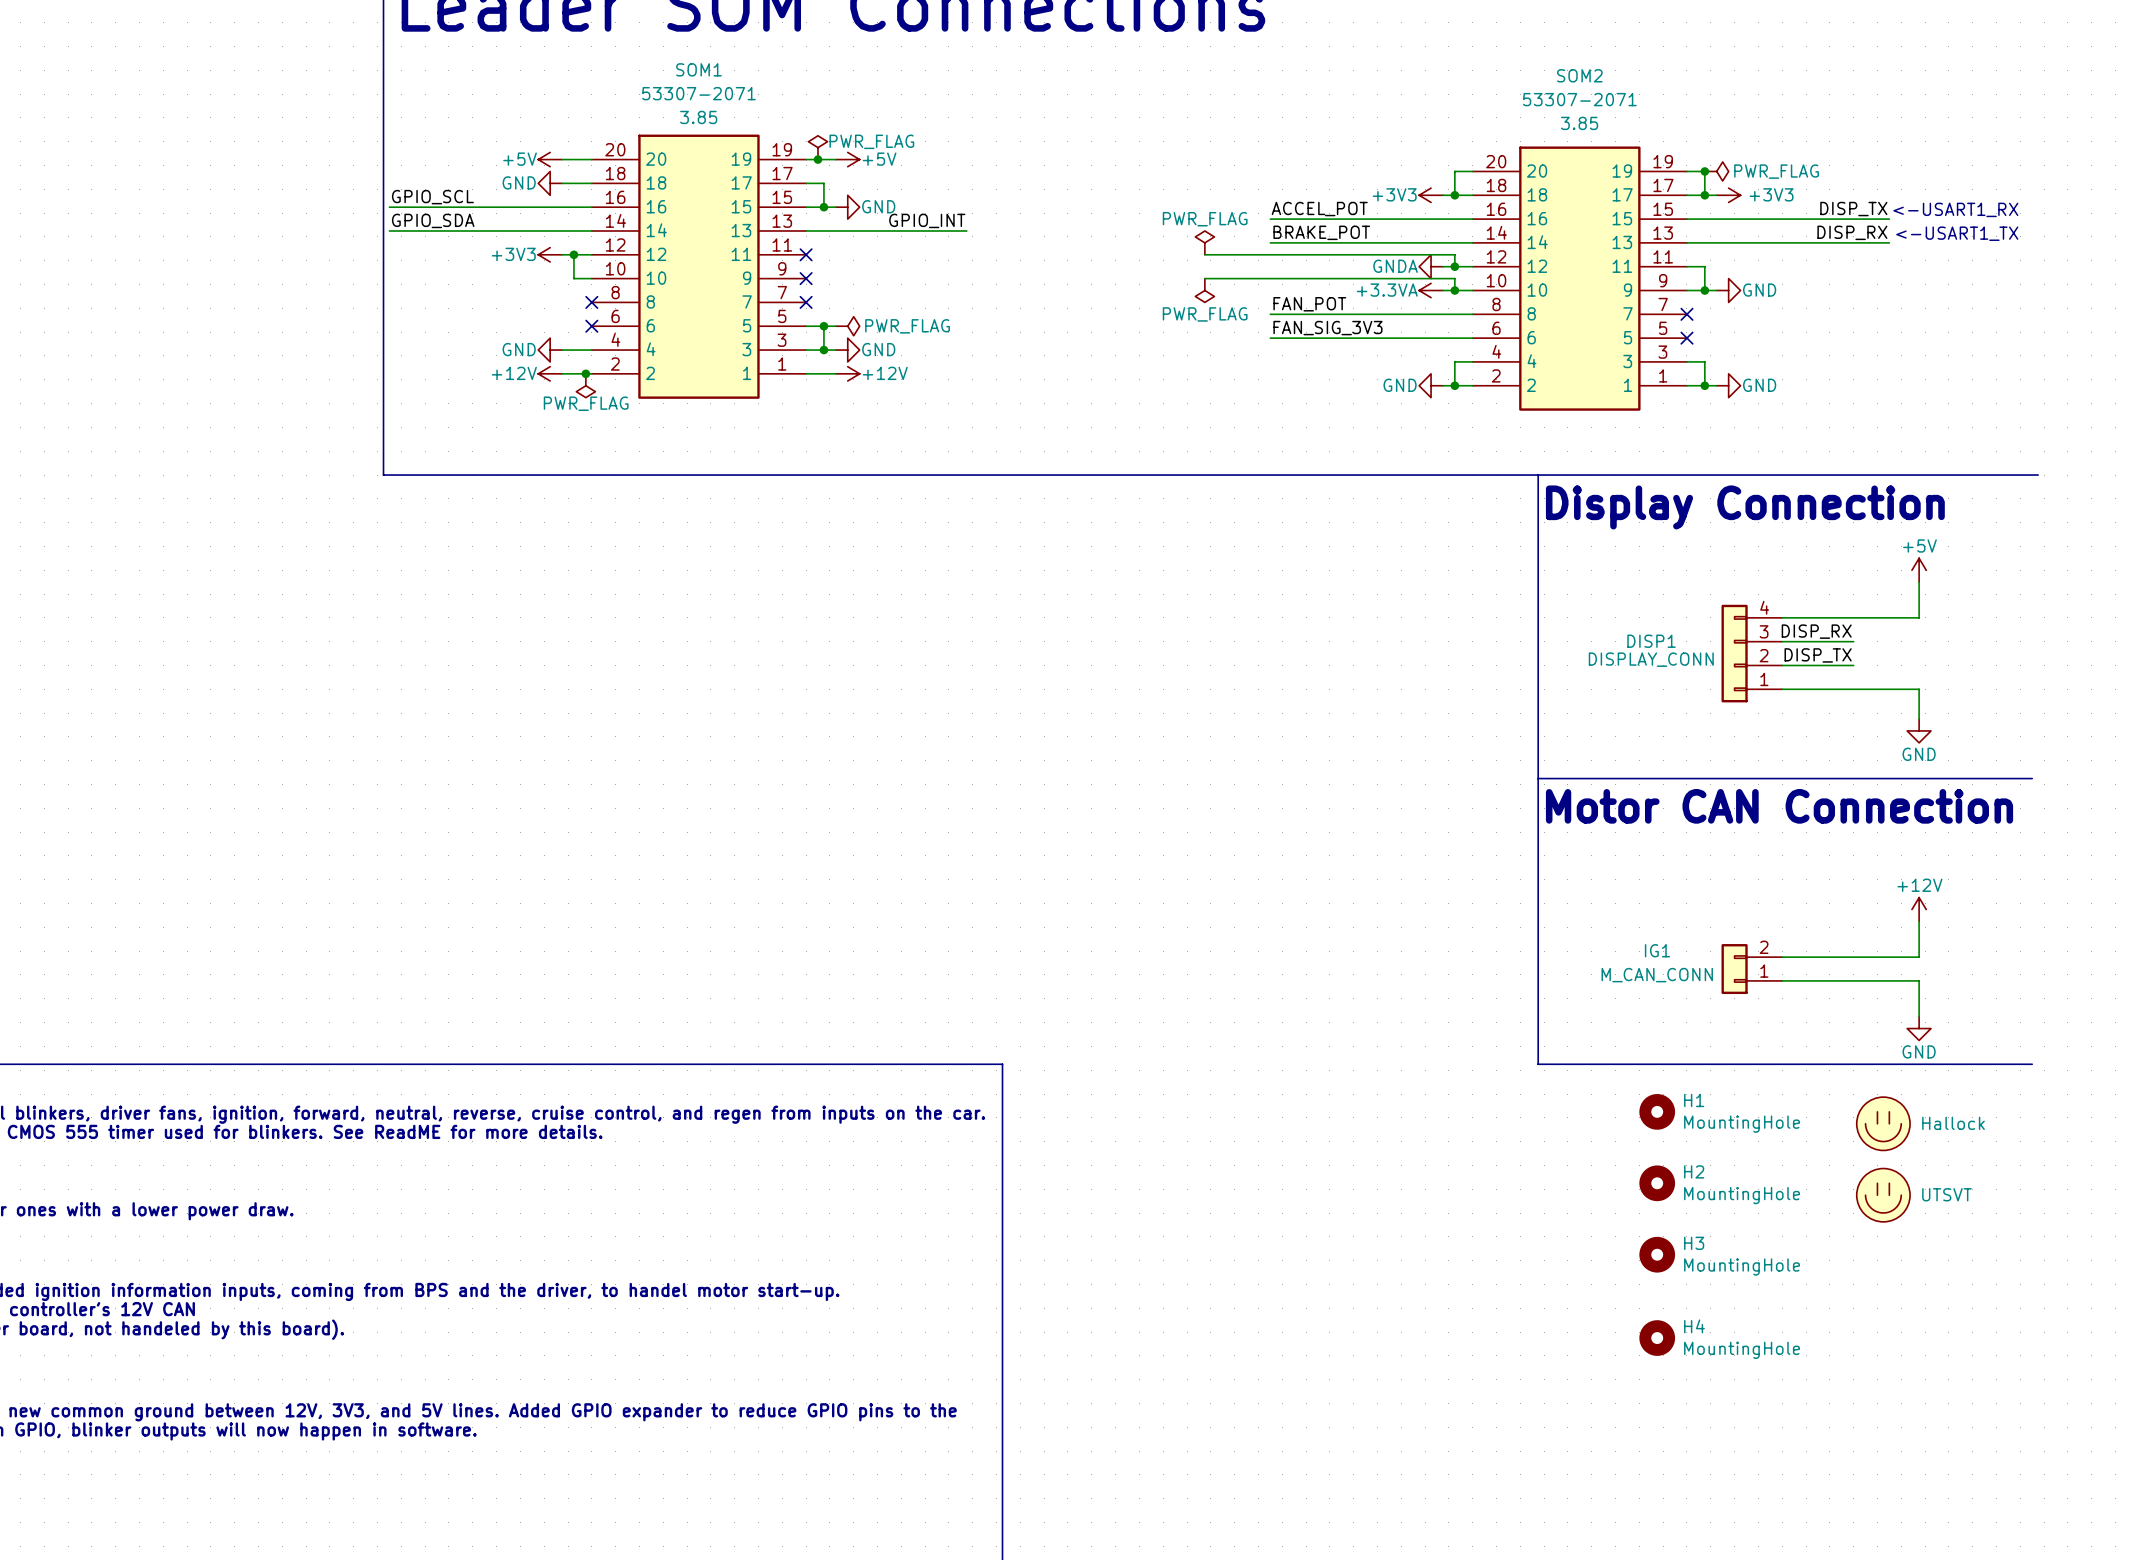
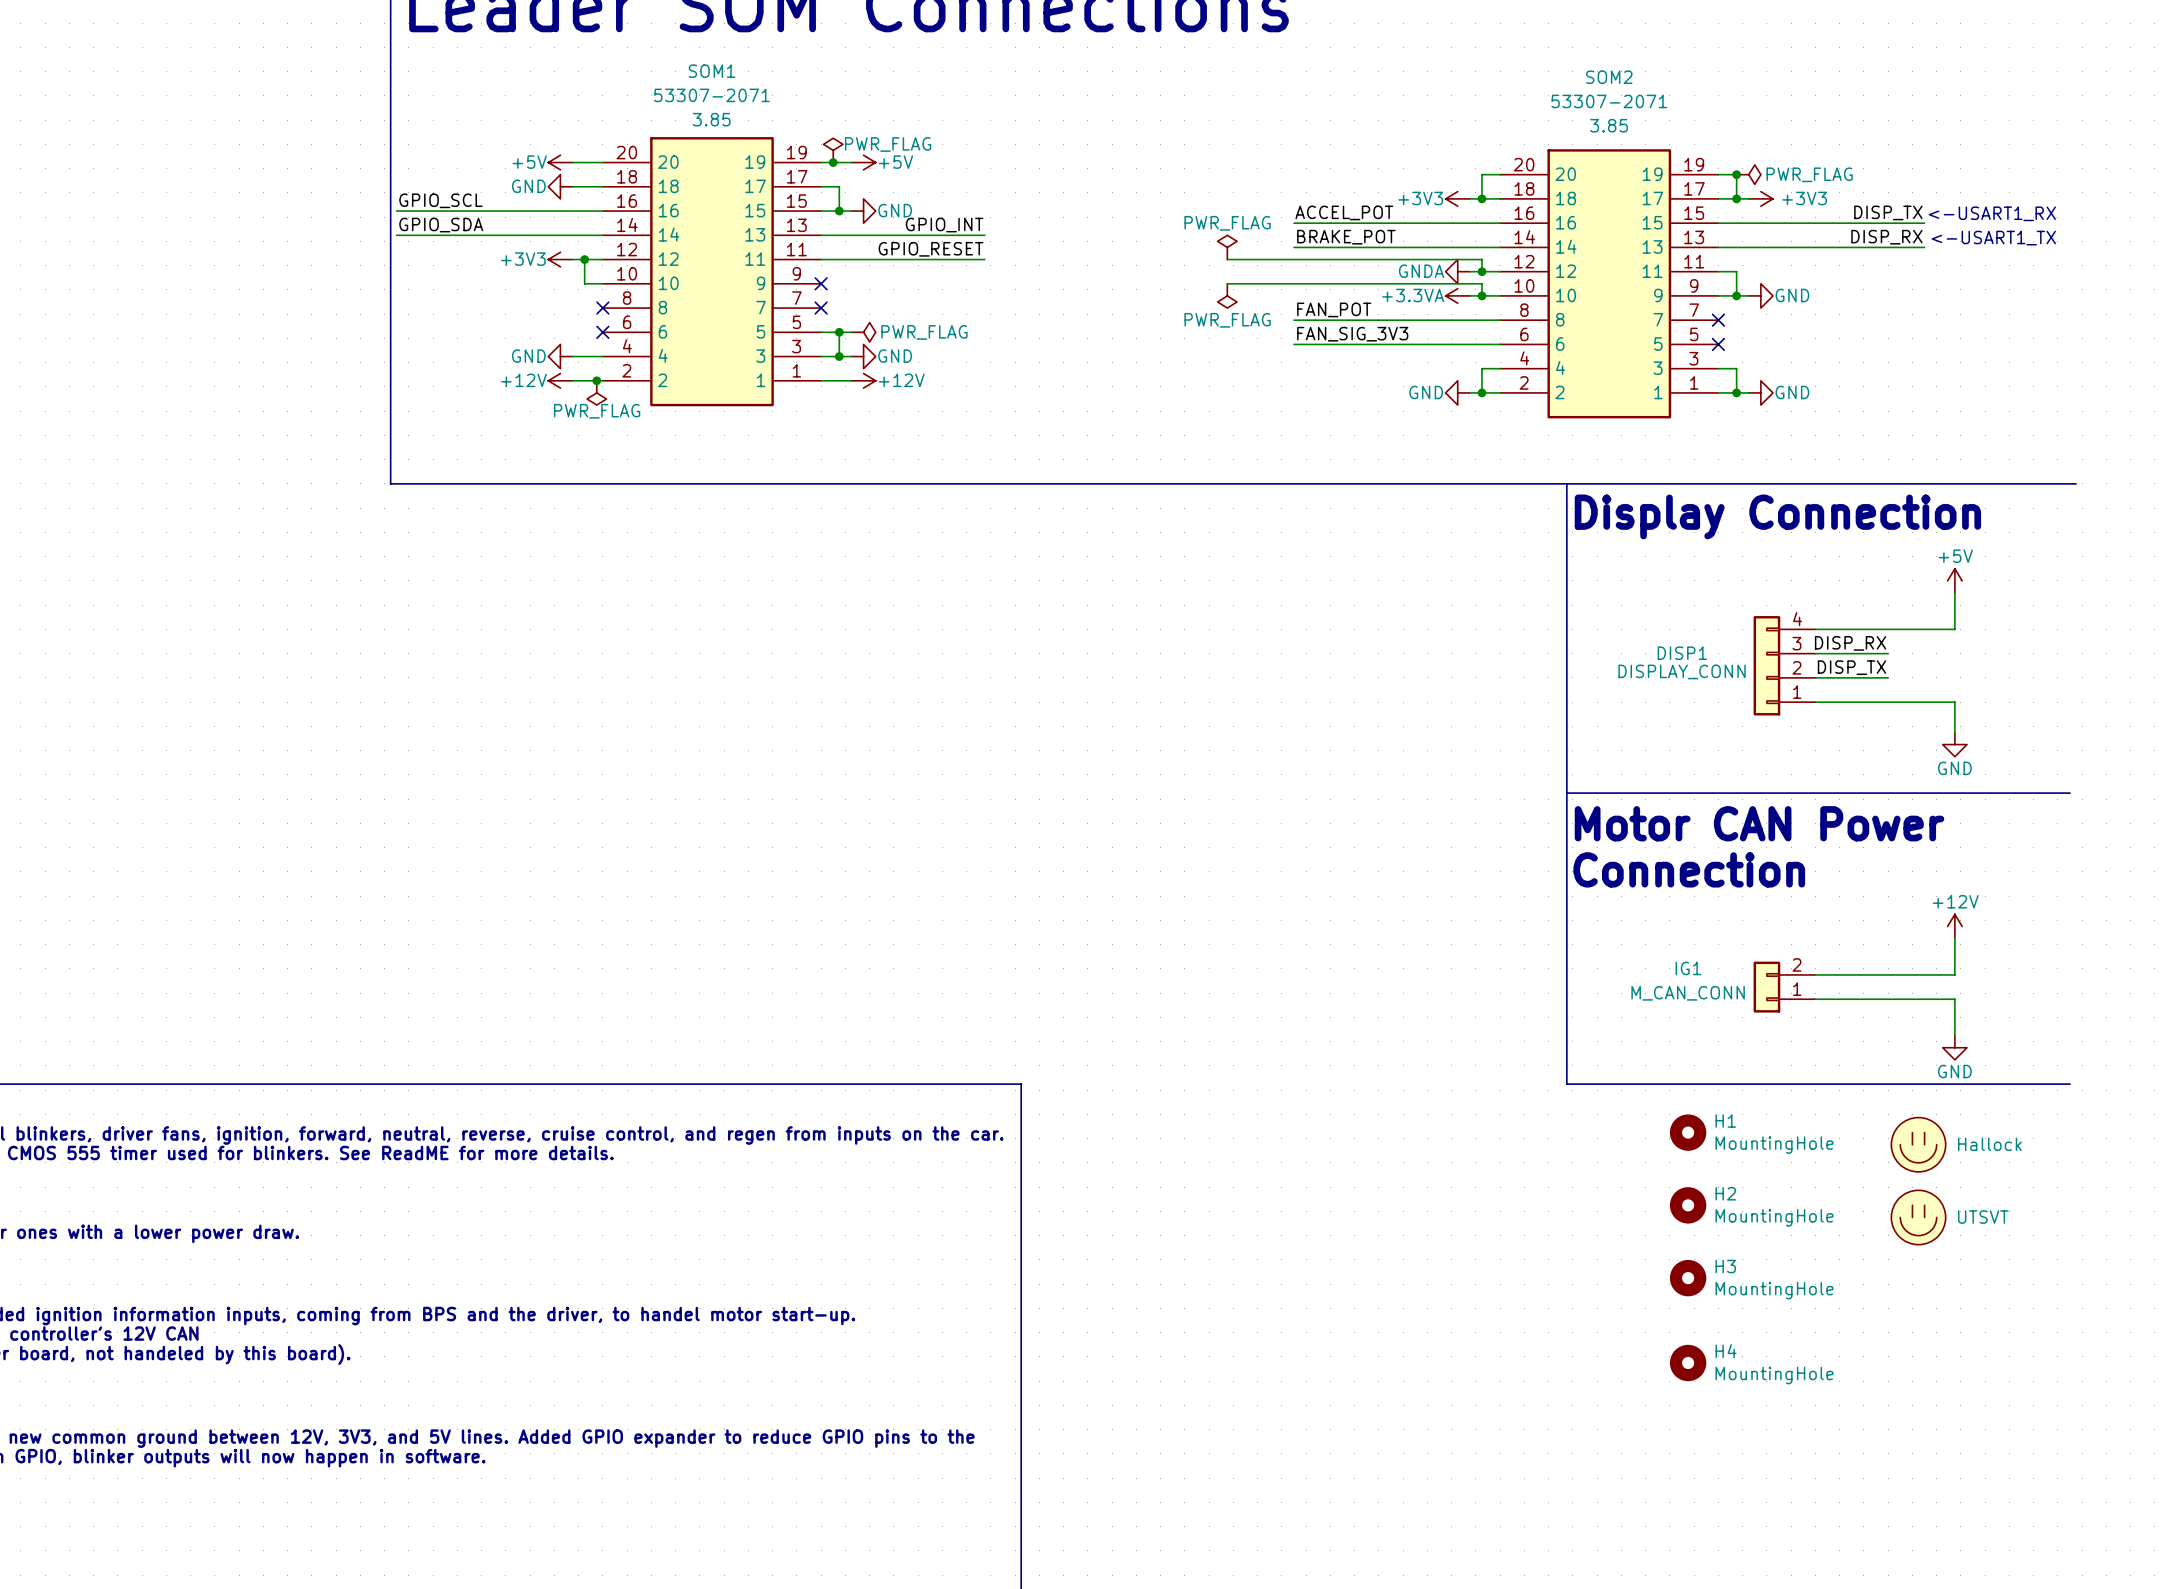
label: none -> GPIO_RESET (931, 249)
wire: none -> (821, 259) (984, 259)
no-connect mark: (806, 254) -> none
text: Motor CAN Connection (1779, 806) -> Motor CAN Power (1759, 823)
text: none -> Connection (1689, 869)

